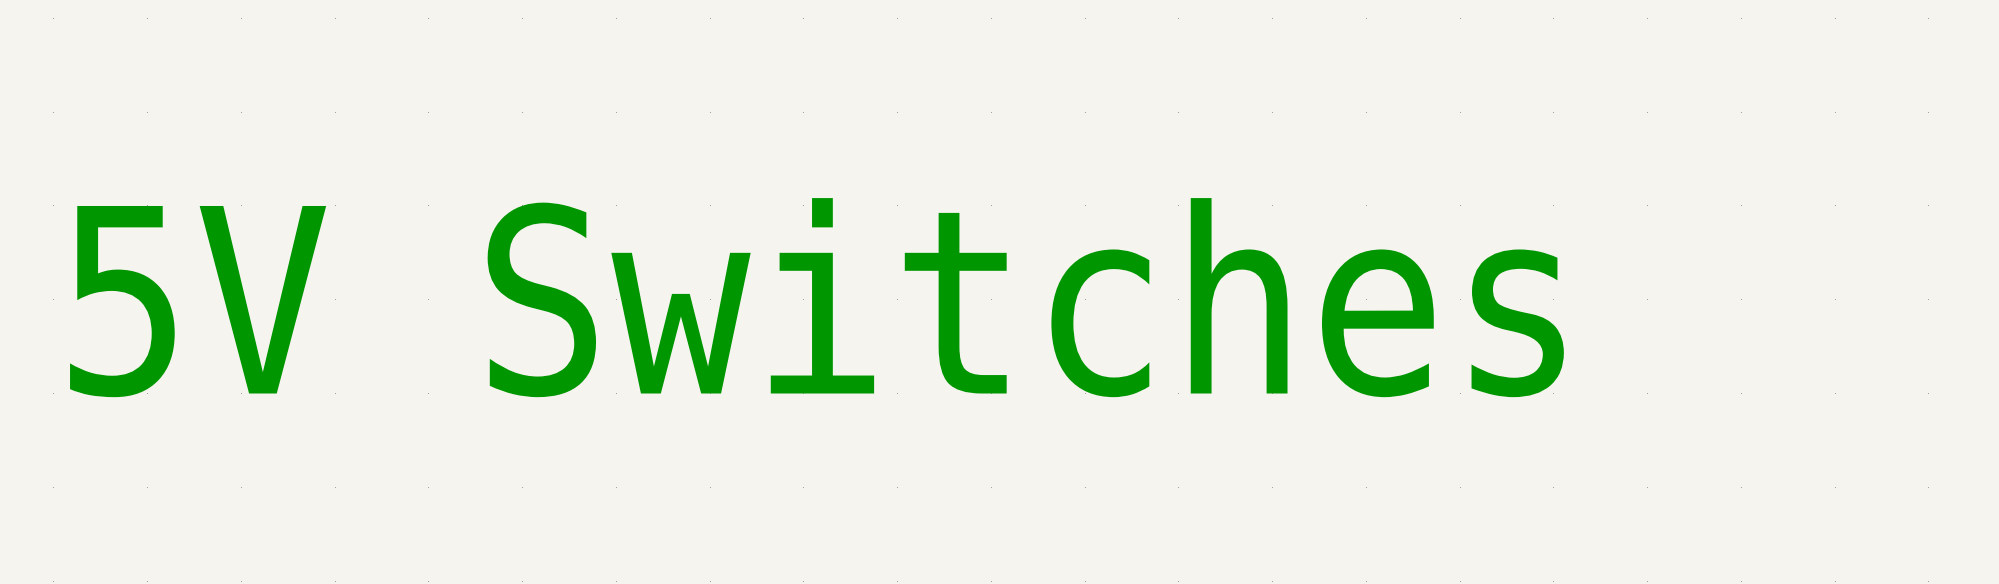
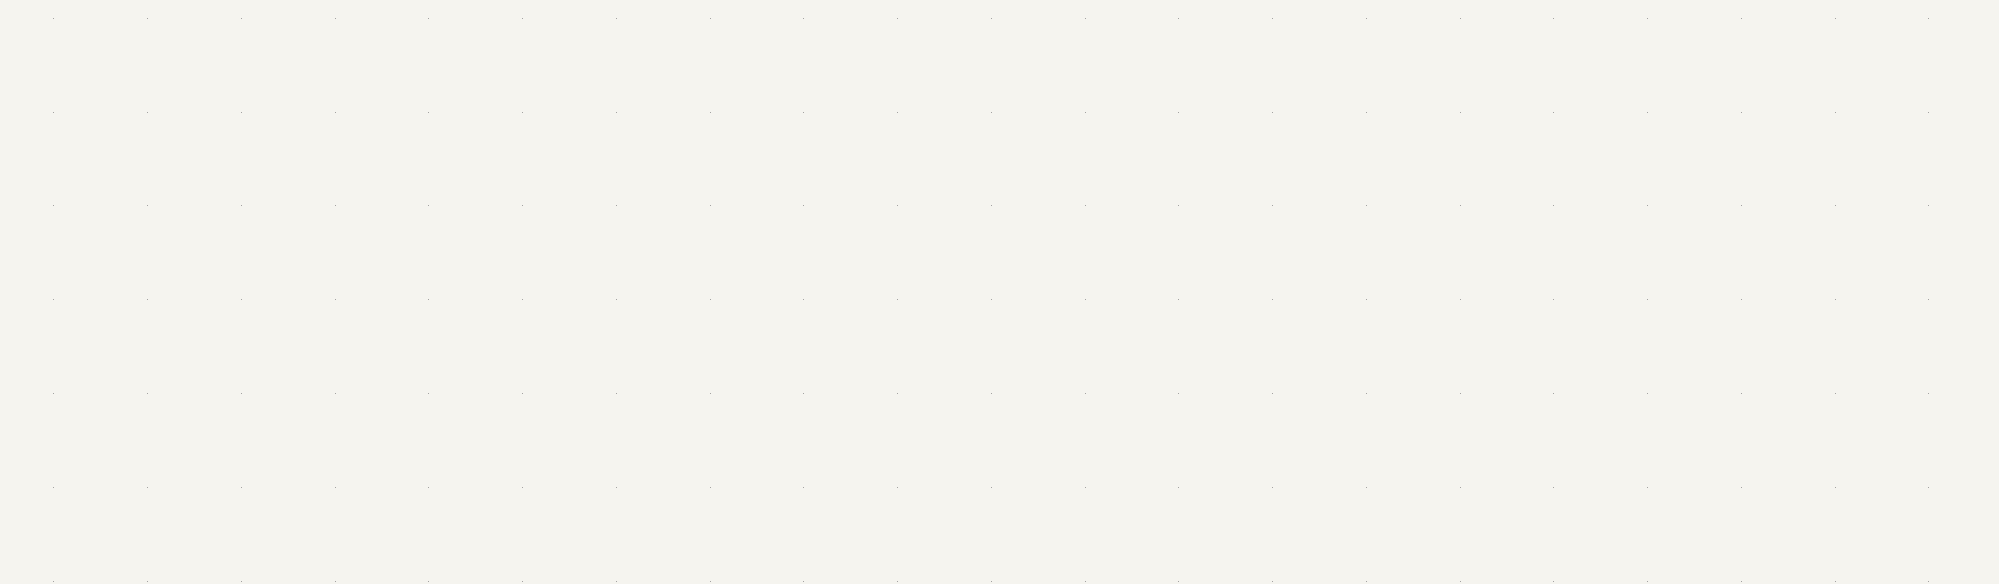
text: 5V Switches (816, 297) -> none

